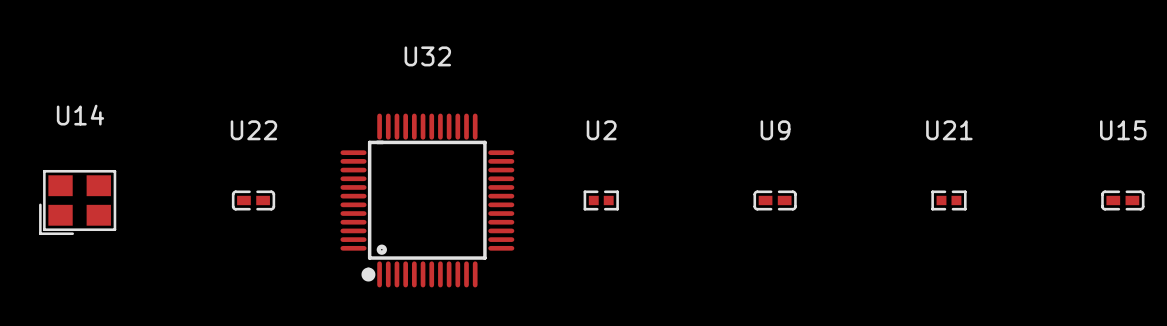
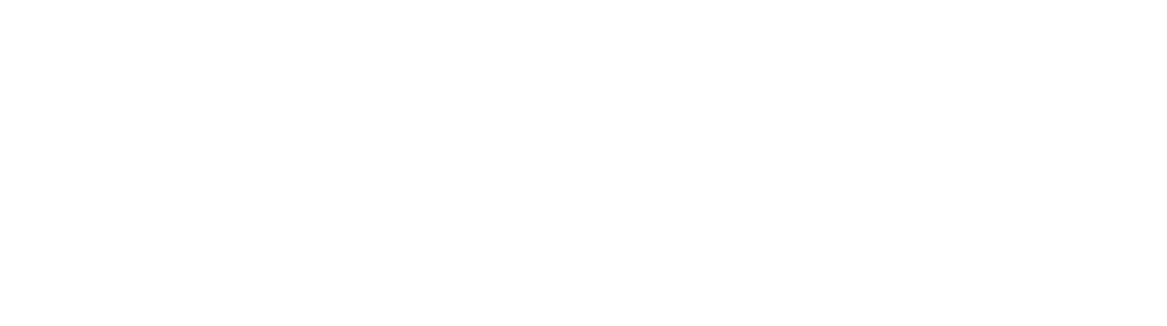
U22: (253, 200) -> none
U32: (427, 200) -> none
U2: (601, 200) -> none
U9: (775, 200) -> none
U21: (948, 200) -> none
U15: (1122, 200) -> none
U14: (77, 202) -> none

